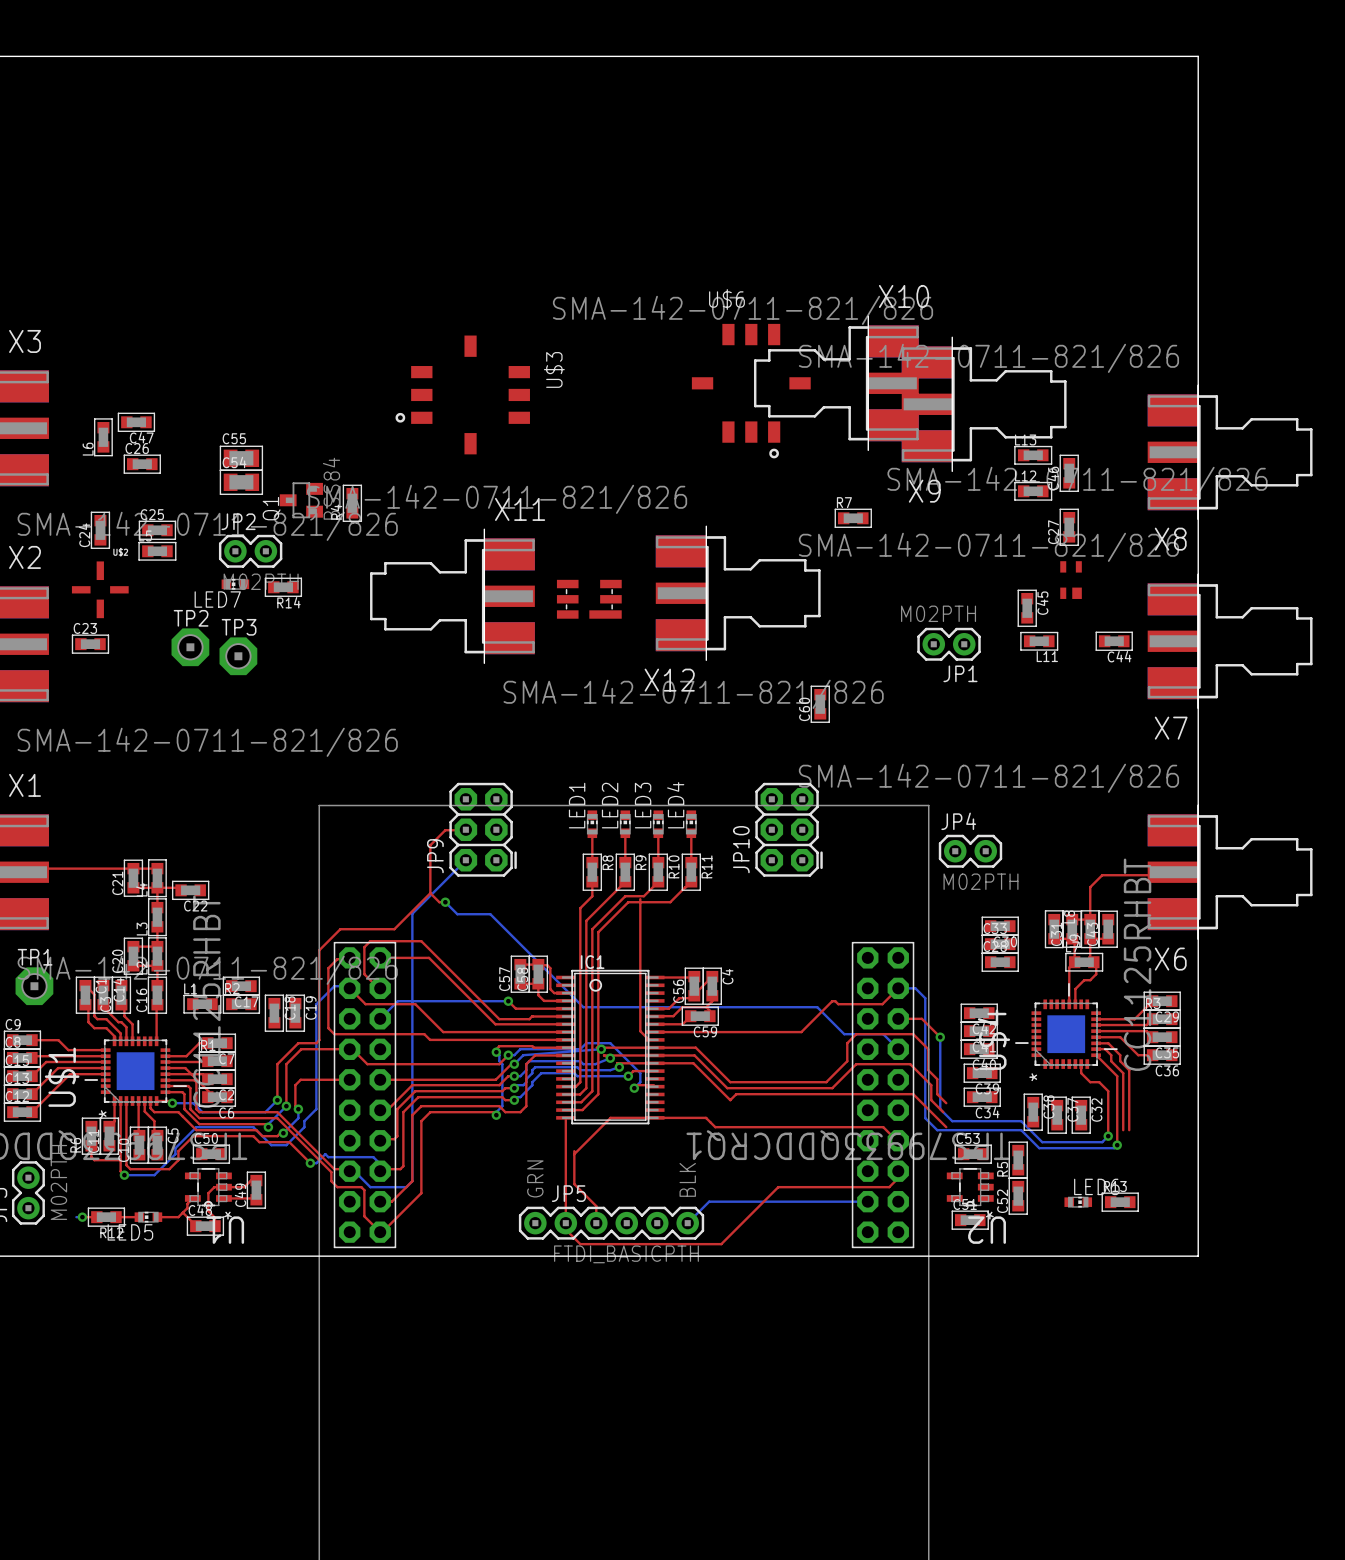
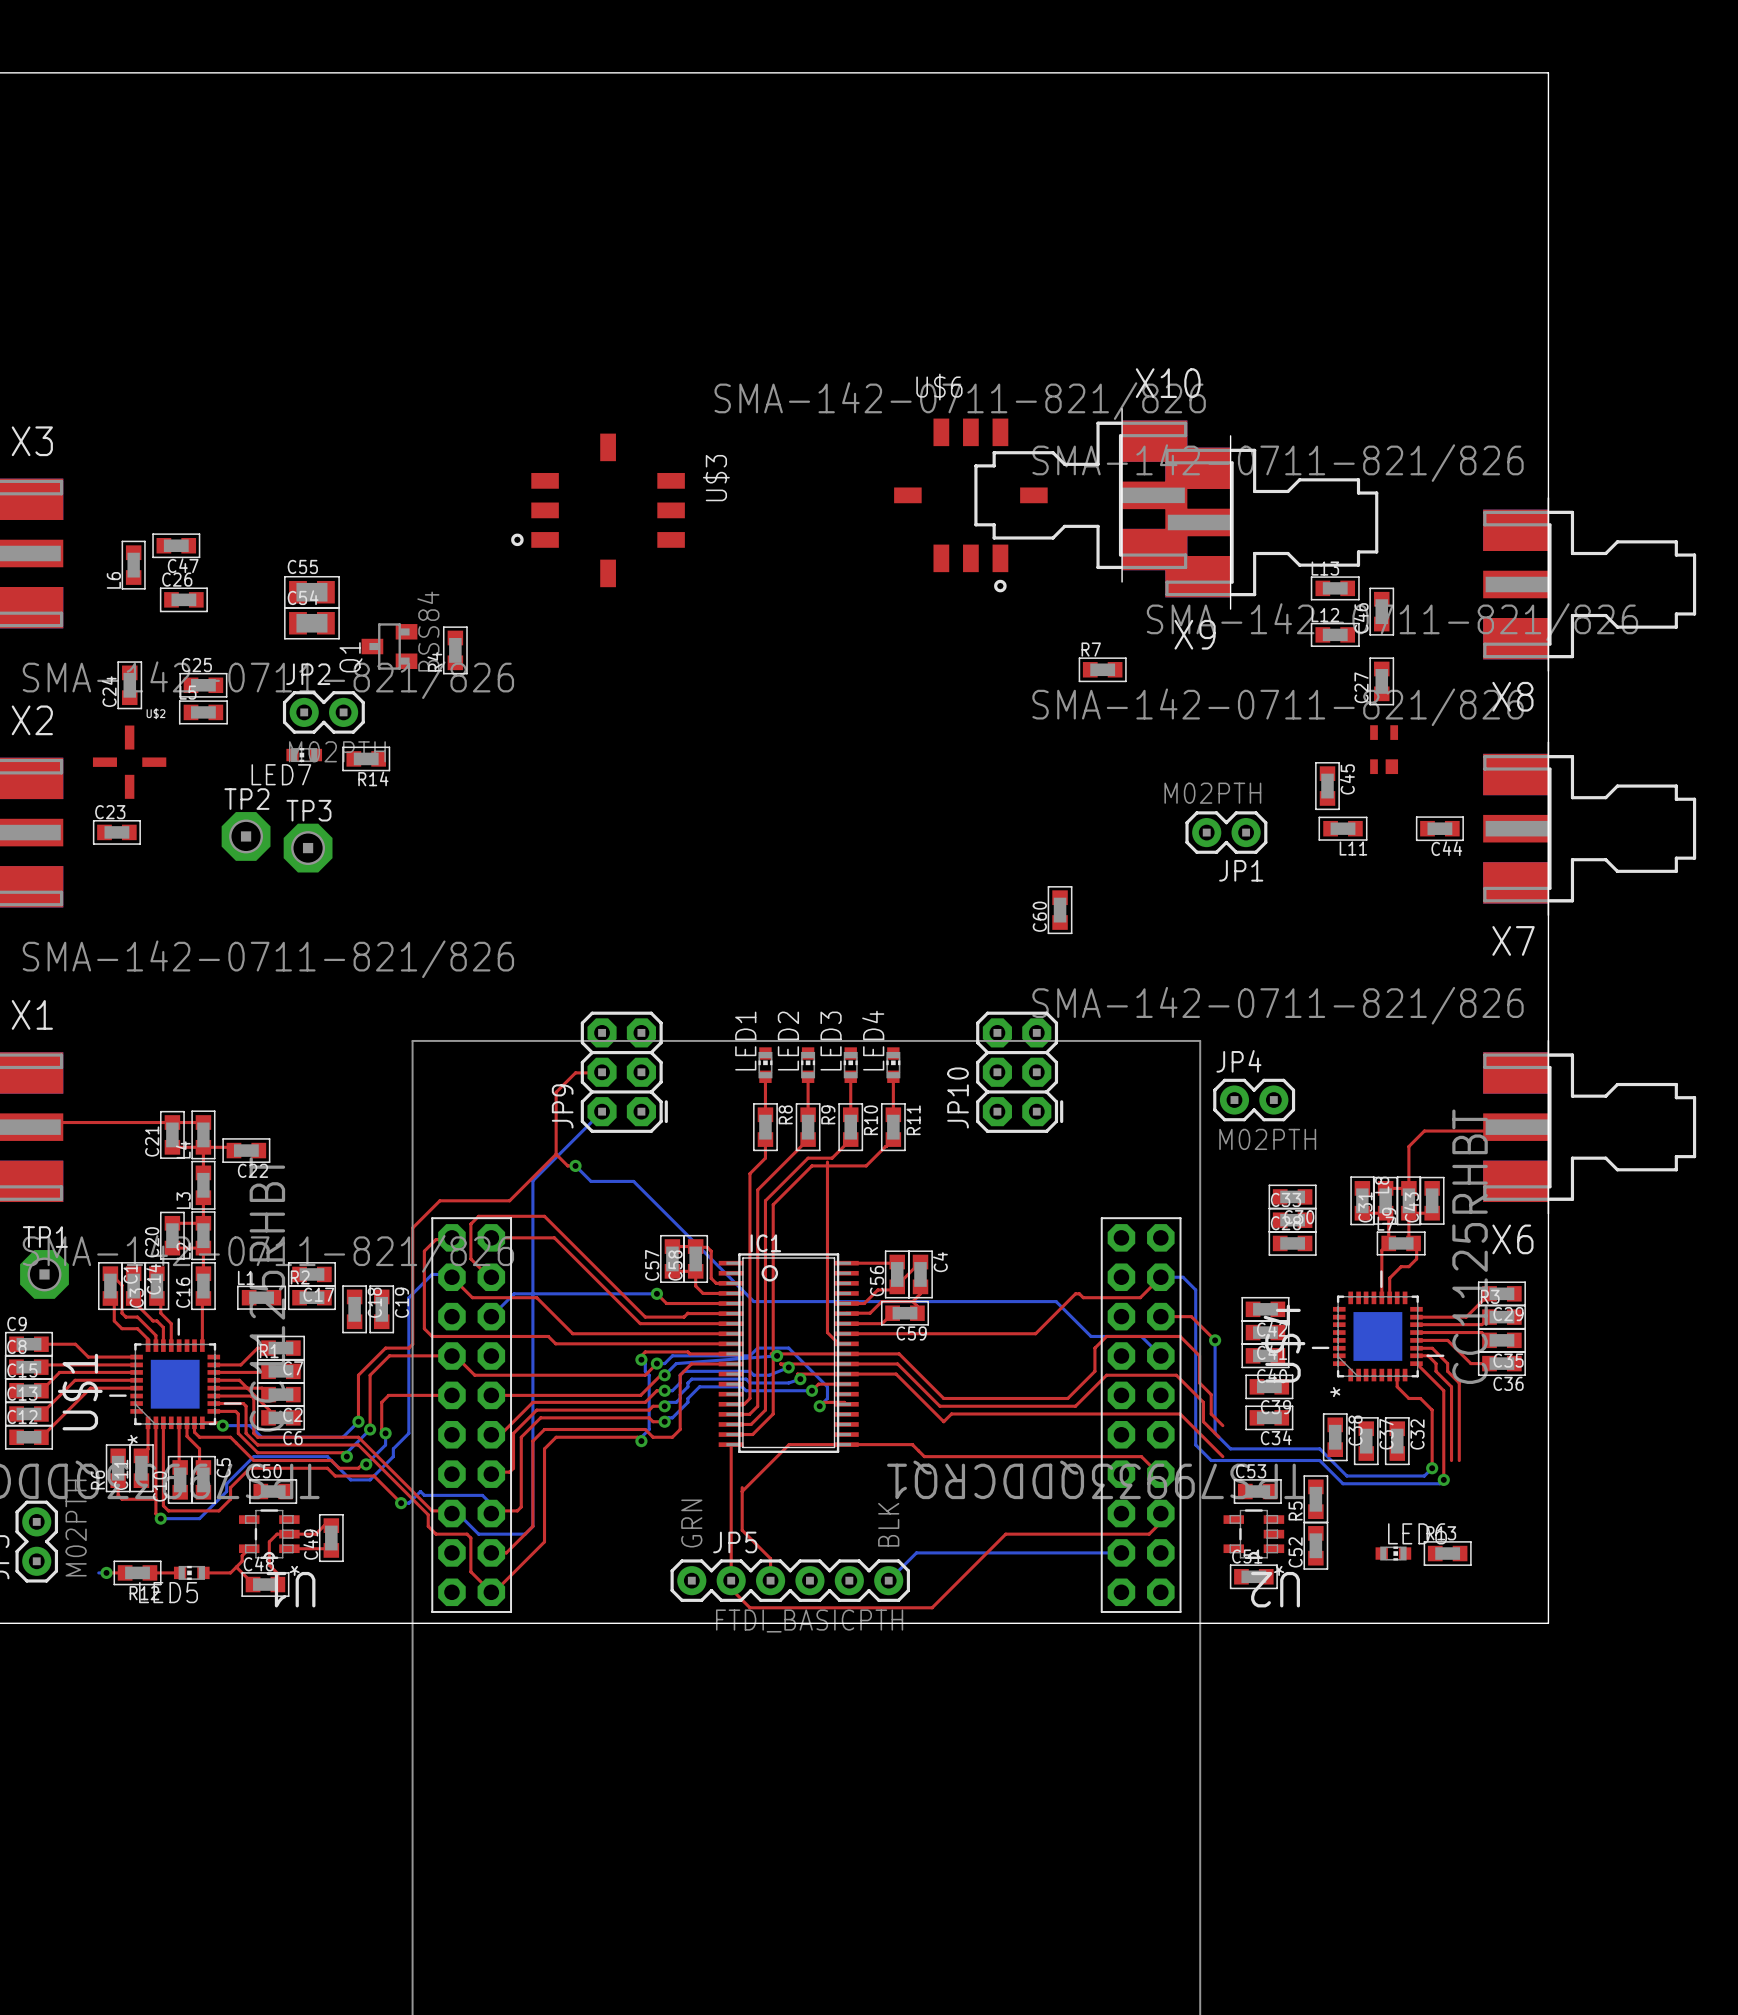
X12: SMA-142-0711-821/826 (738, 593) -> none
X11: SMA-142-0711-821/826 (452, 596) -> none
part: (589, 599) -> none

